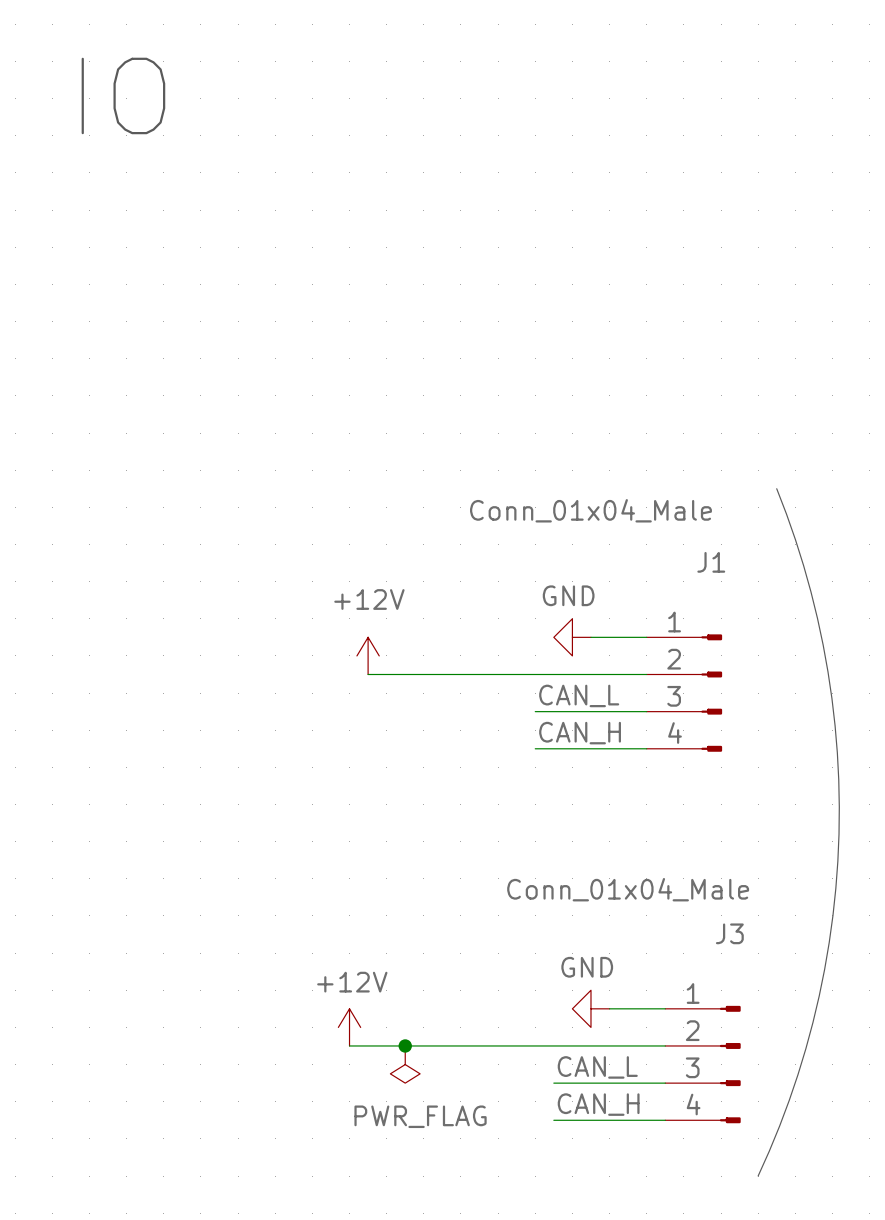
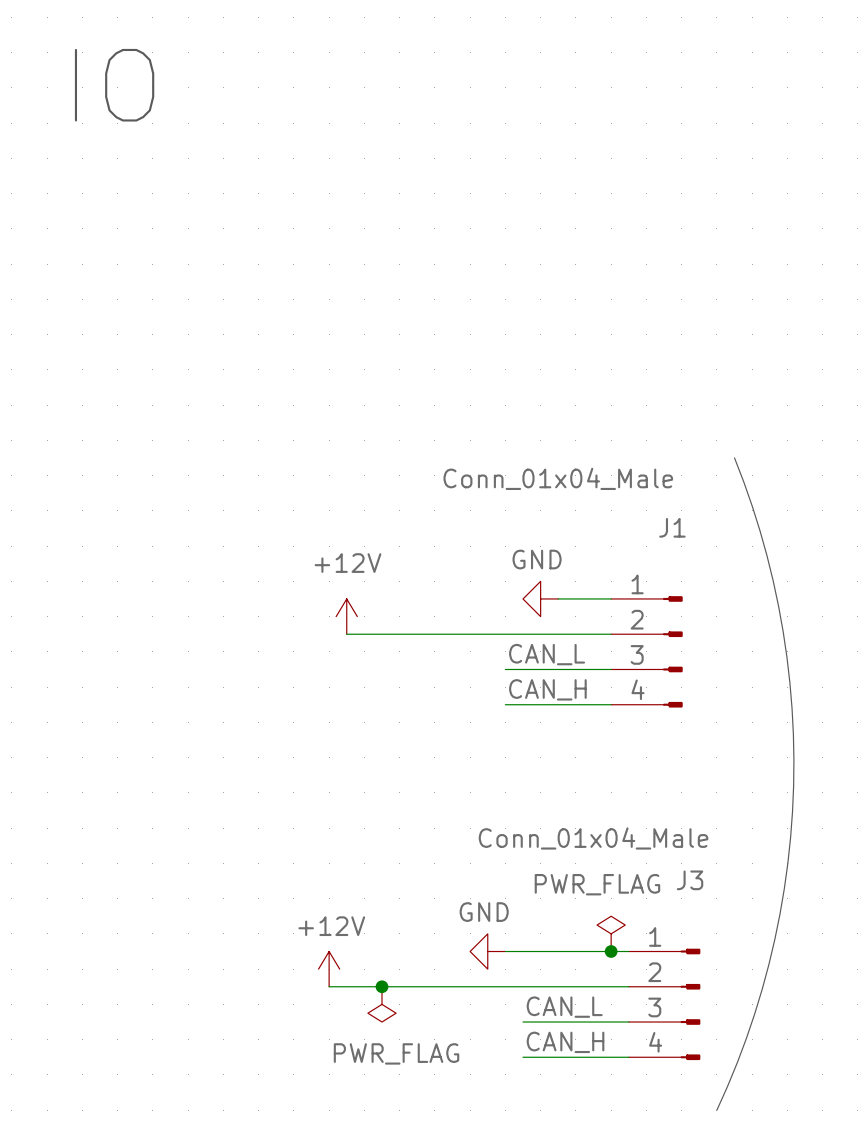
power symbol: none -> PWR_FLAG (611, 933)
wire: none -> (505, 951) (575, 951)
power symbol position: GND (590, 1008) -> GND (487, 951)
junction: none -> (611, 951)

